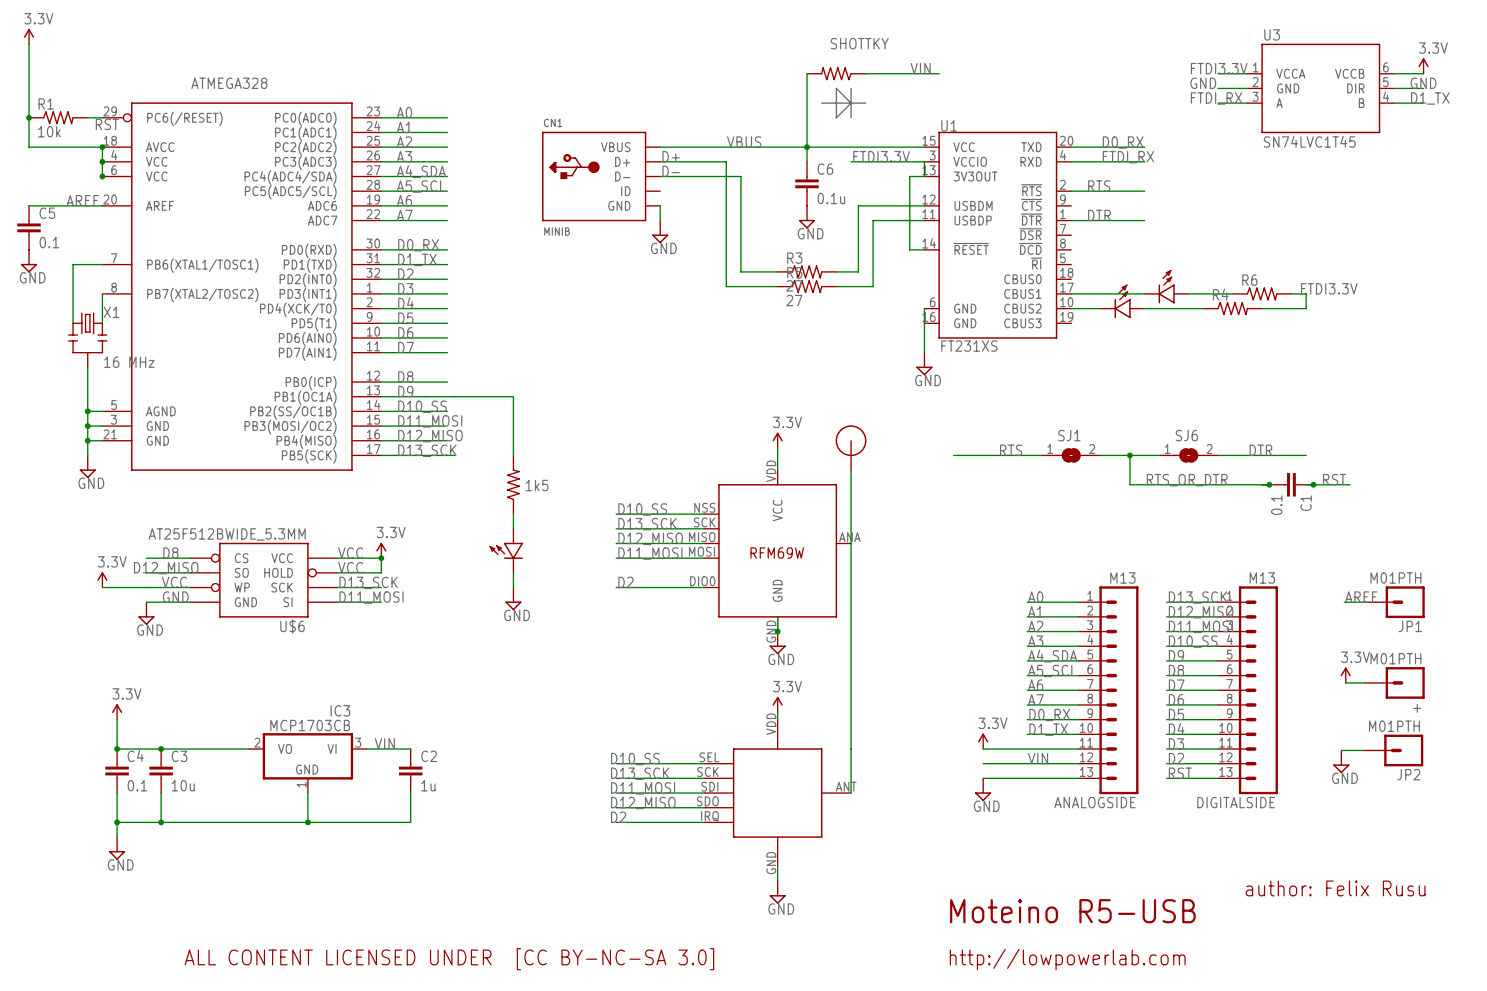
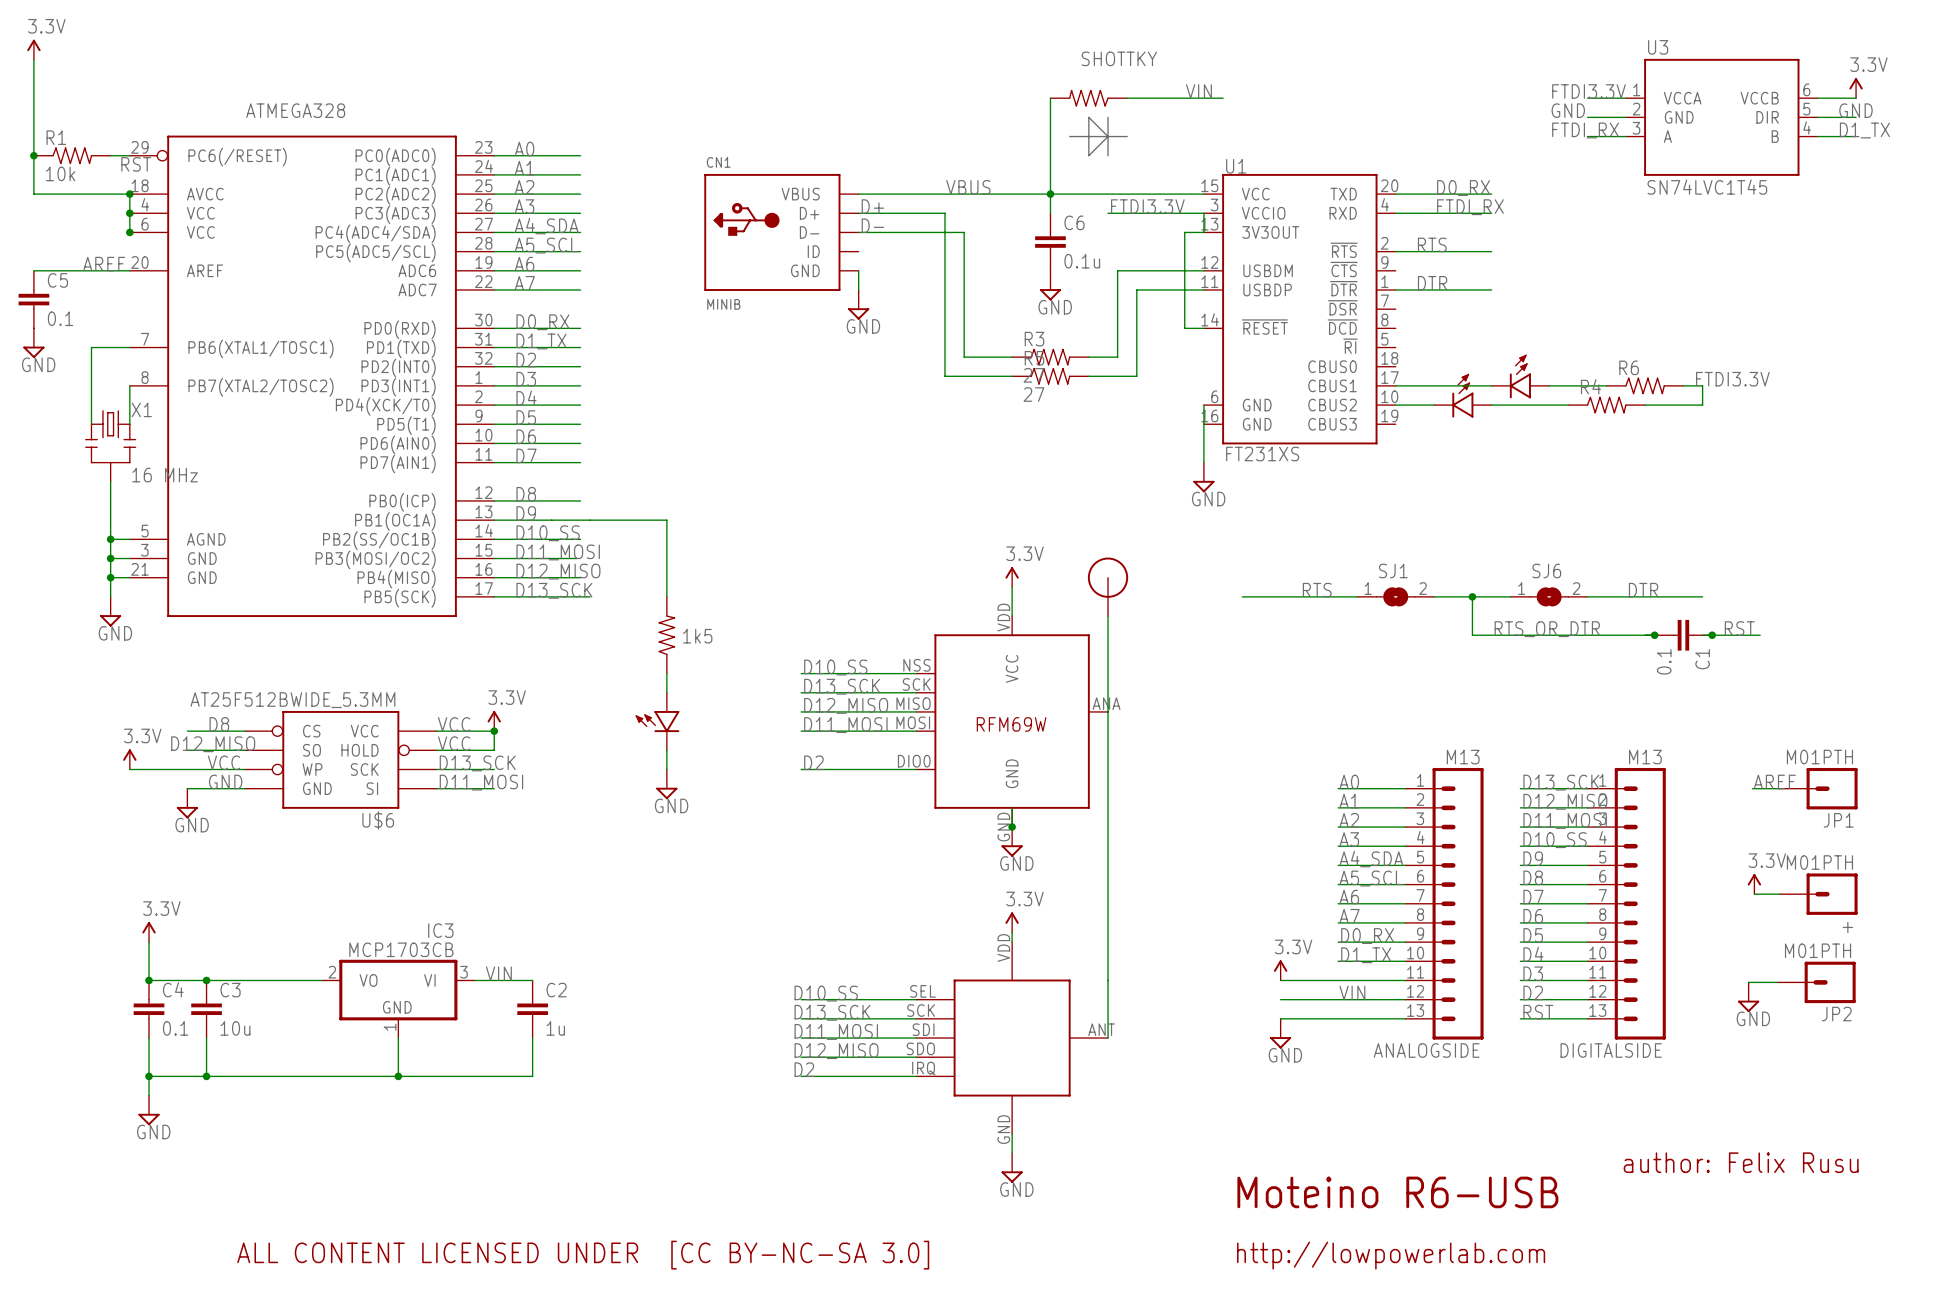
text: Moteino R5-USB (1072, 911) -> Moteino R6-USB (1397, 1192)

